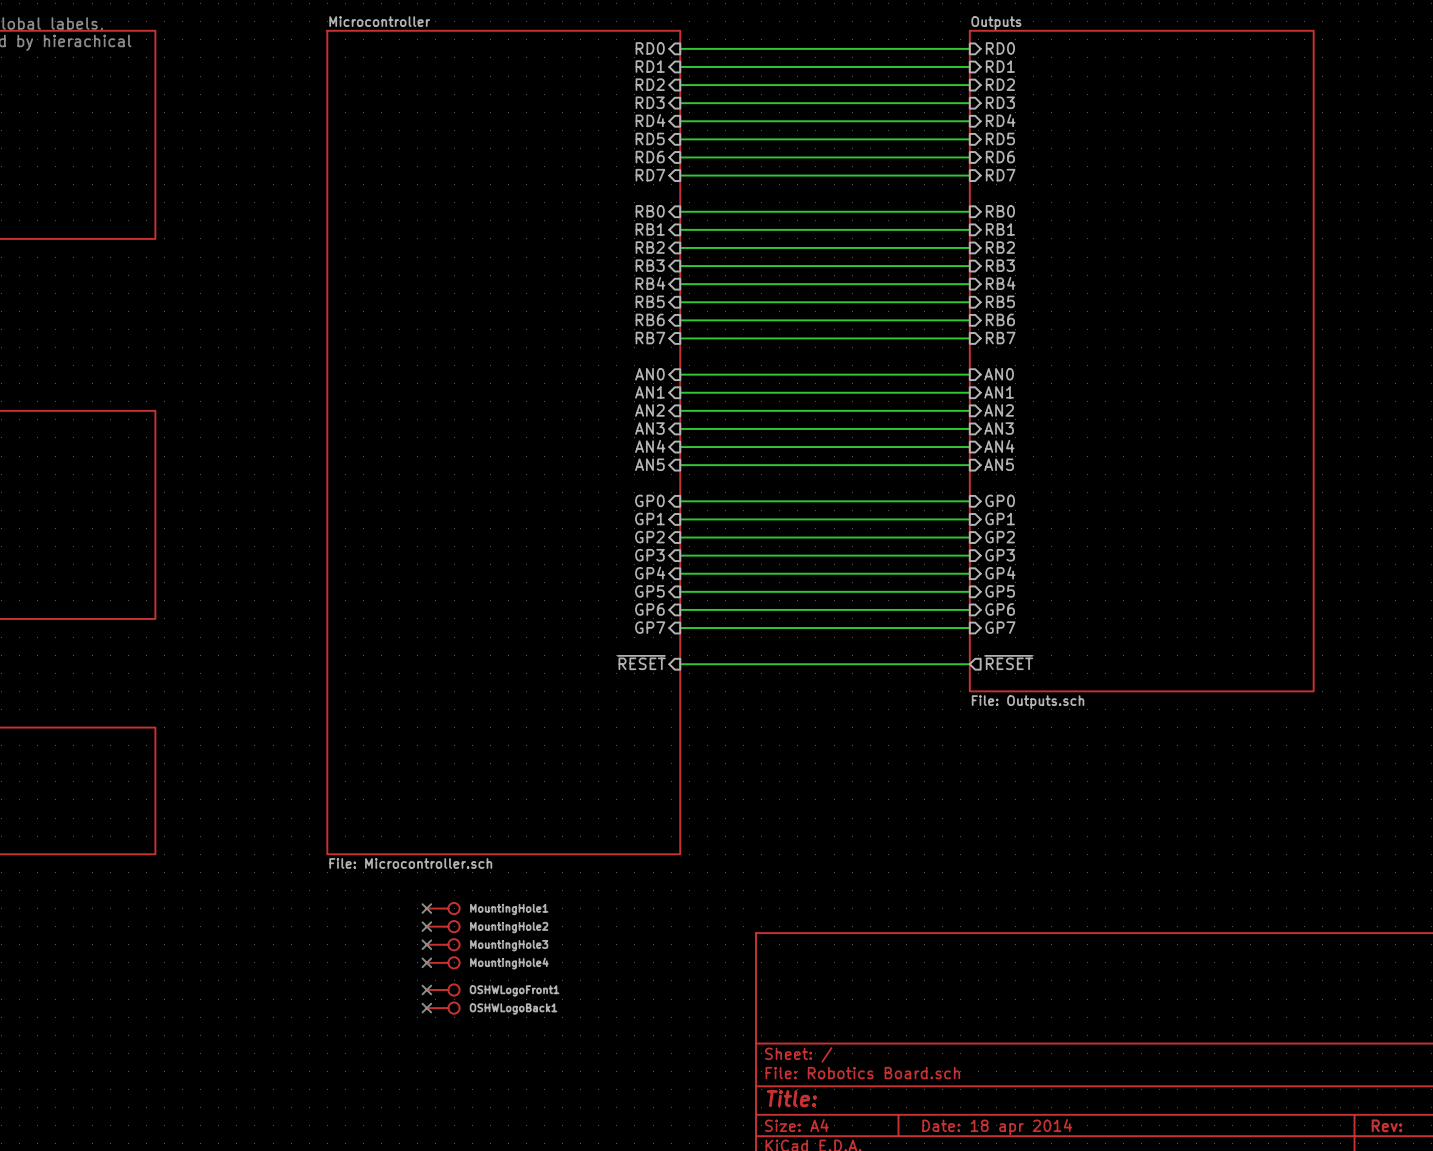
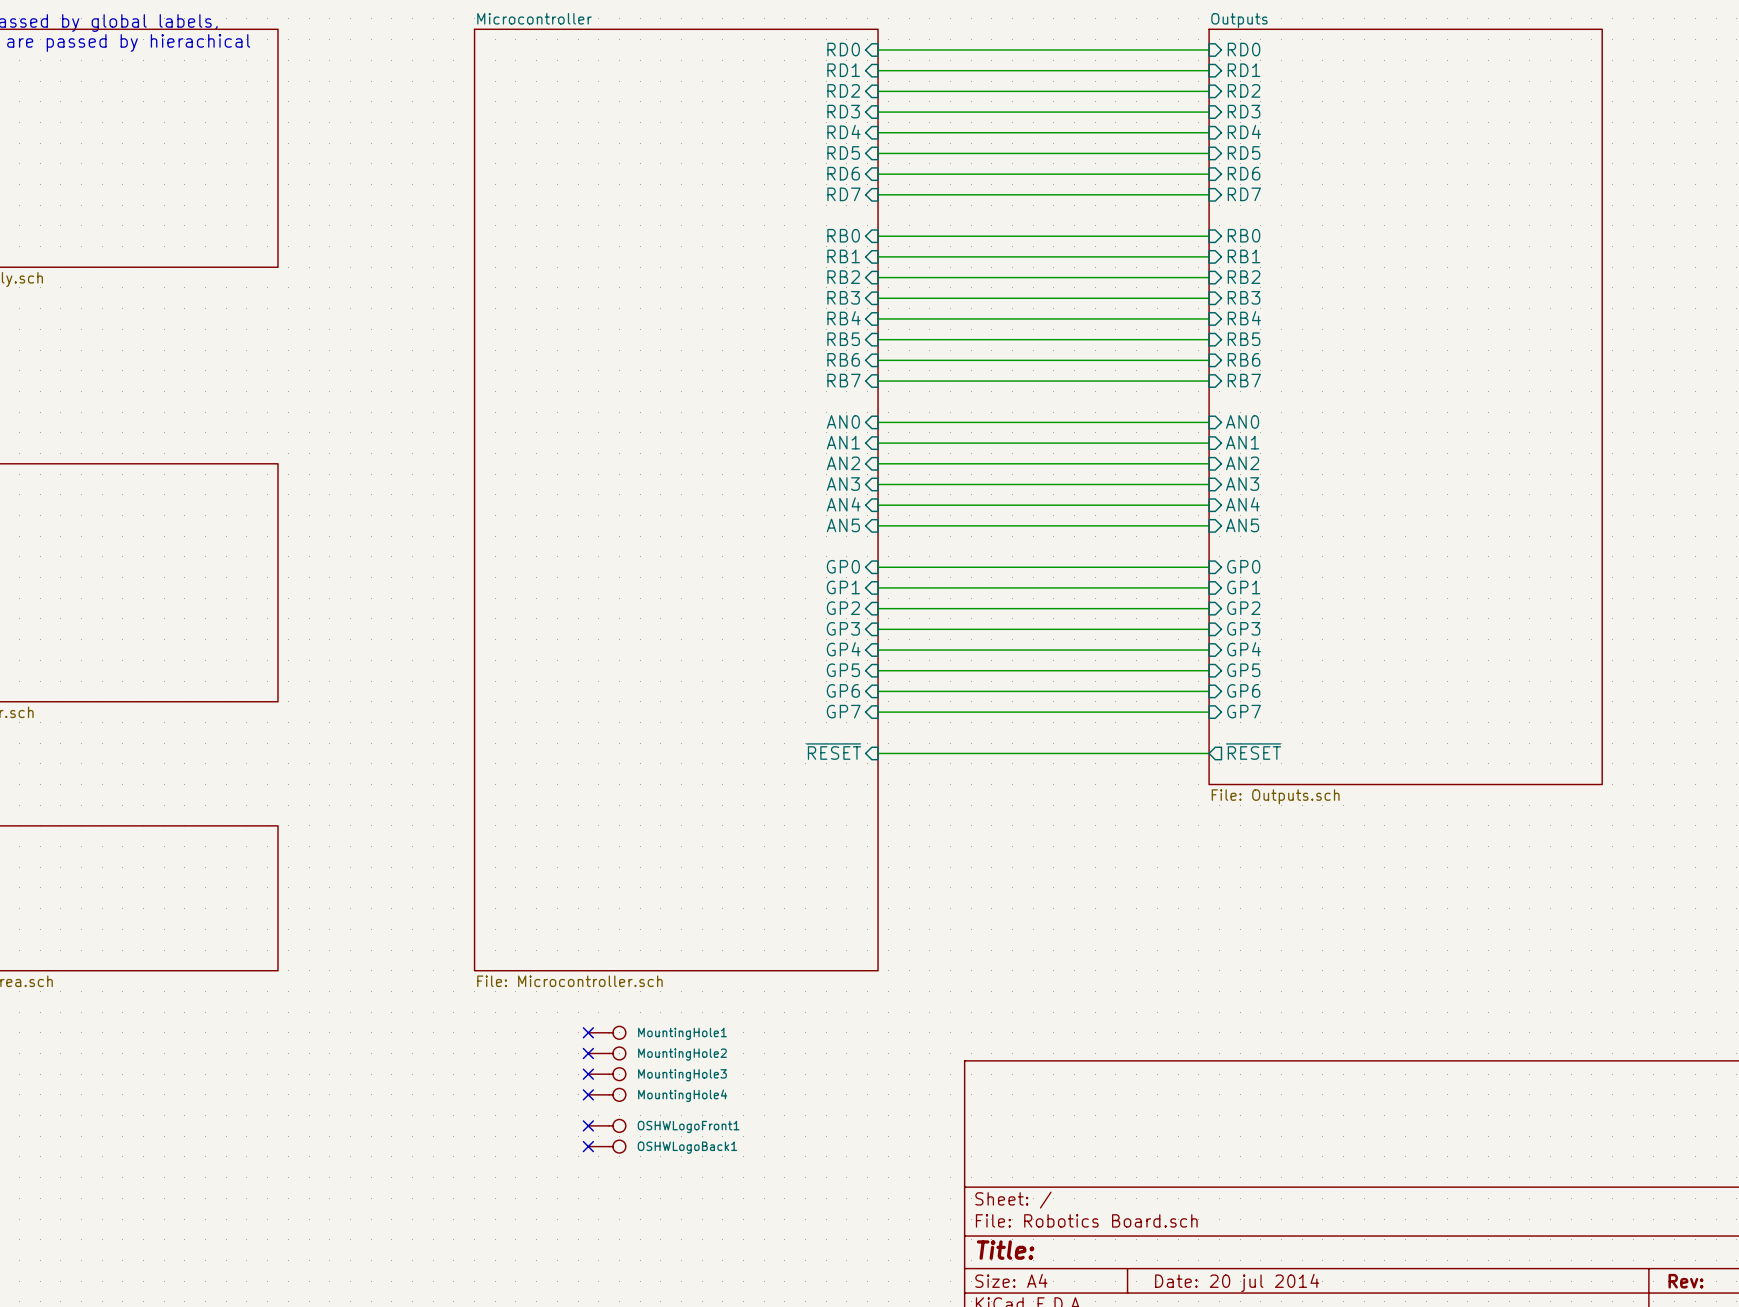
title block: Date: 18 apr 2014 (997, 1127) -> Date: 20 jul 2014 (1237, 1282)

